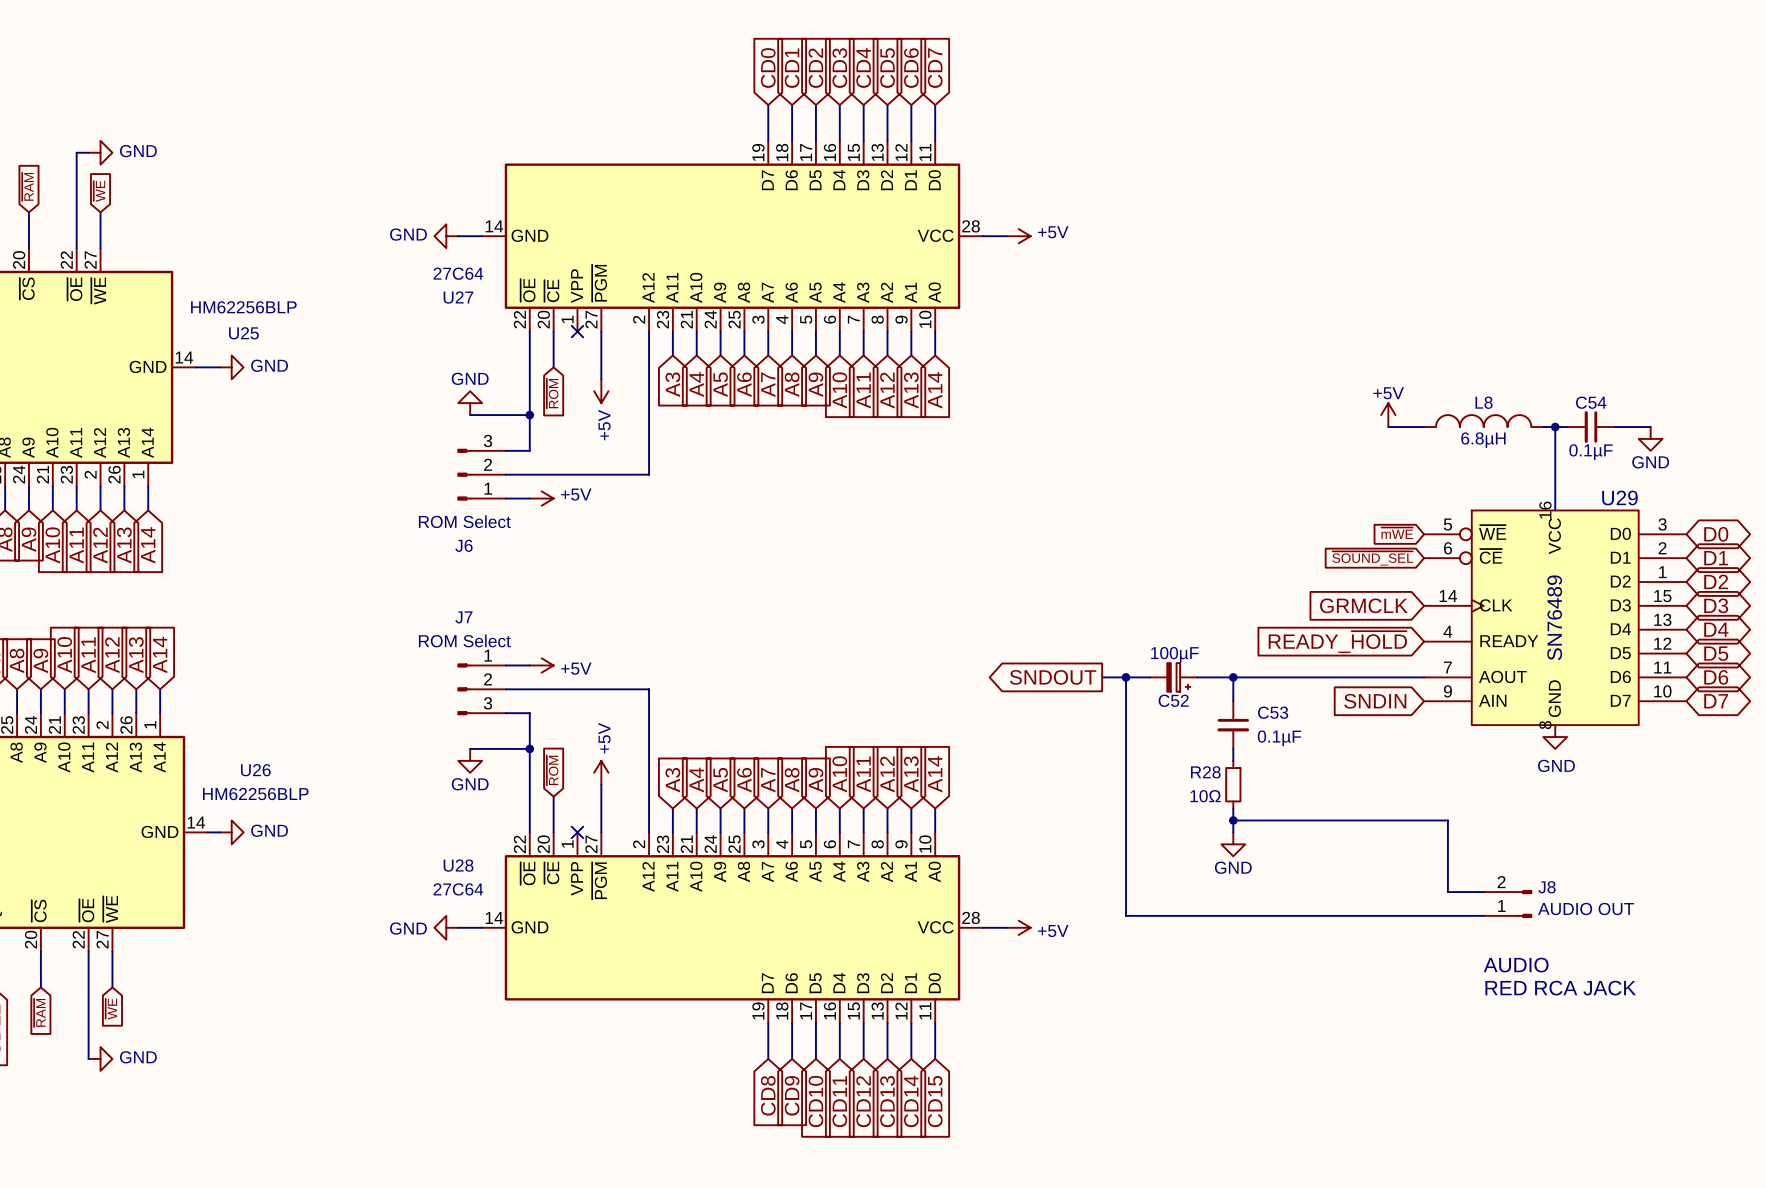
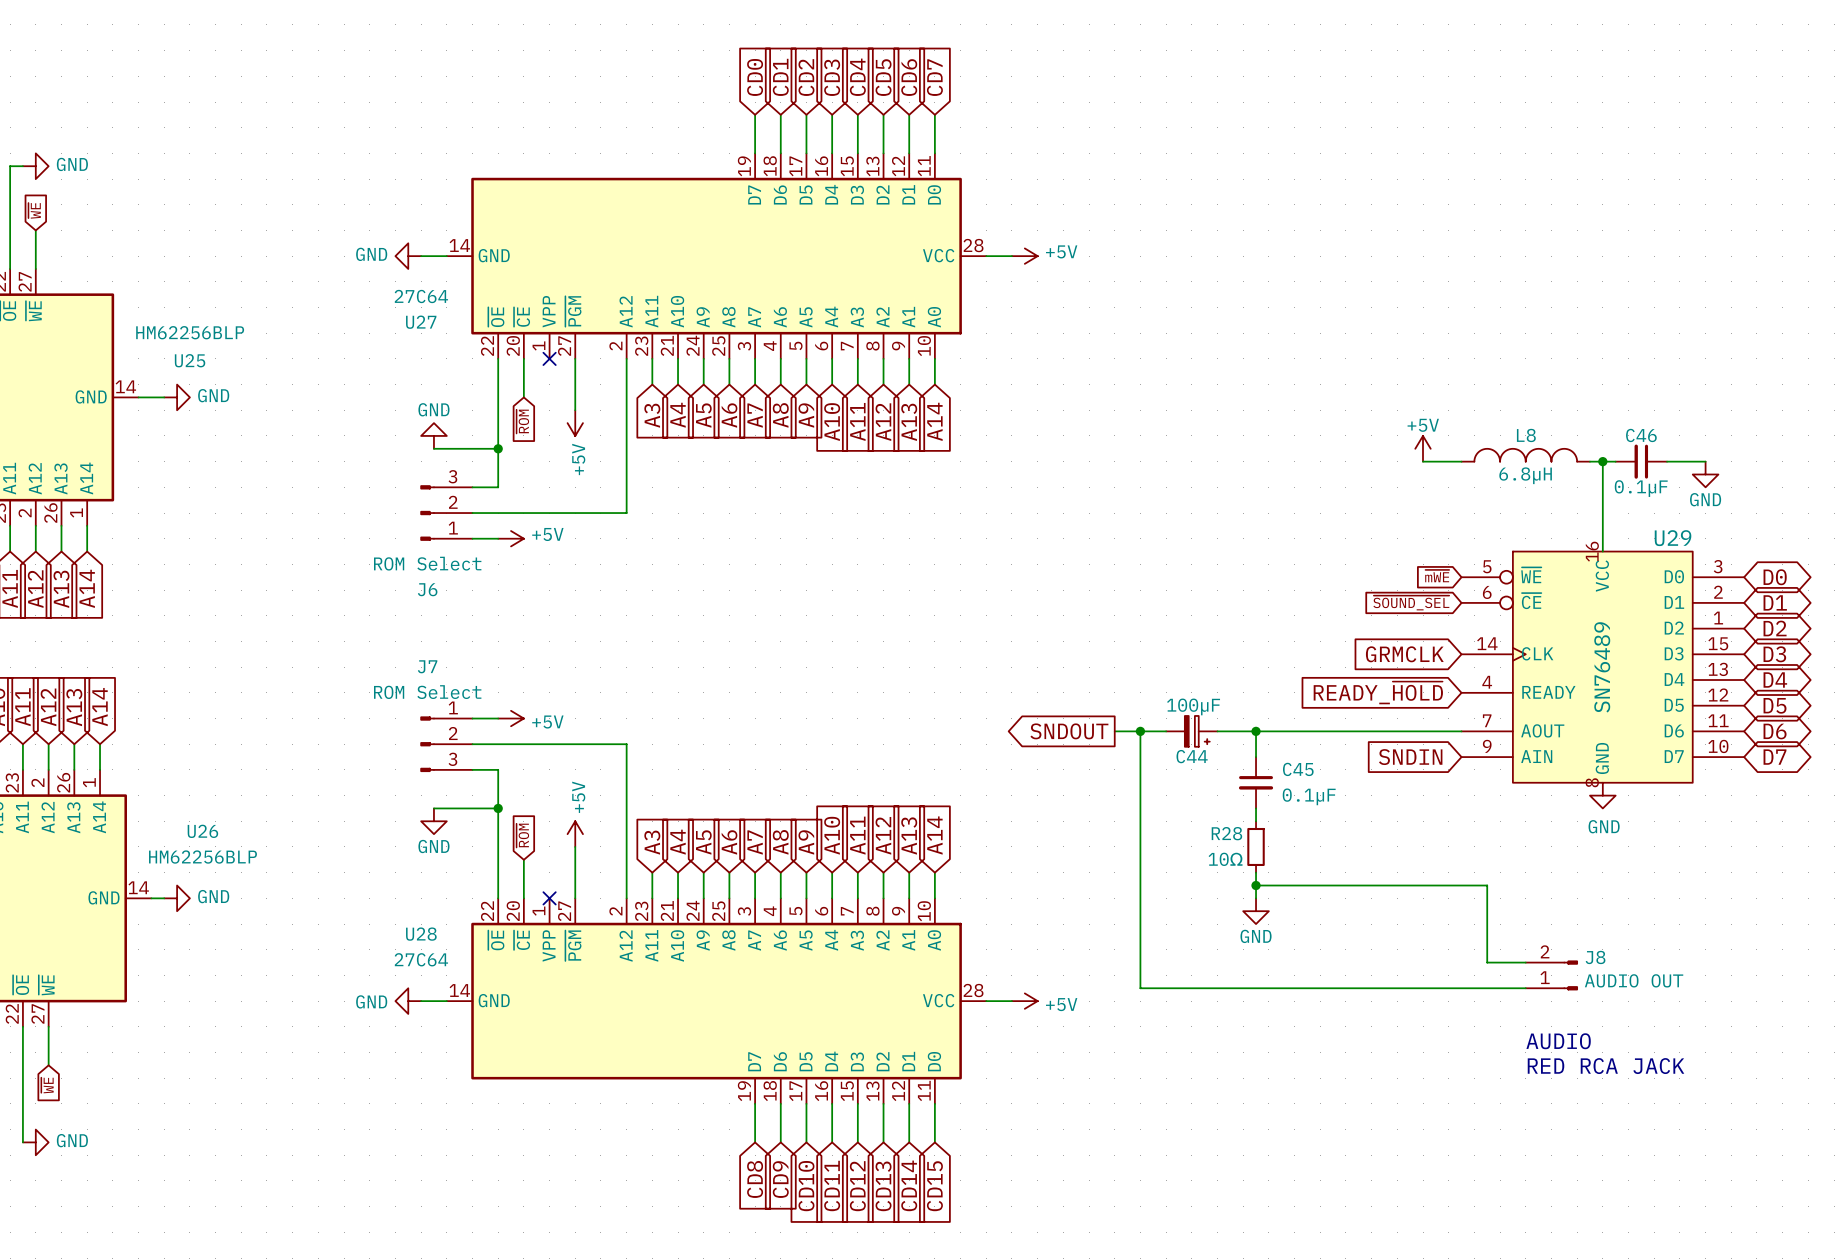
C54 name: C54 (1591, 402) -> C46 (1641, 435)
C52 name: C52 (1173, 700) -> C44 (1192, 756)
C53 name: C53 (1273, 712) -> C45 (1298, 769)

